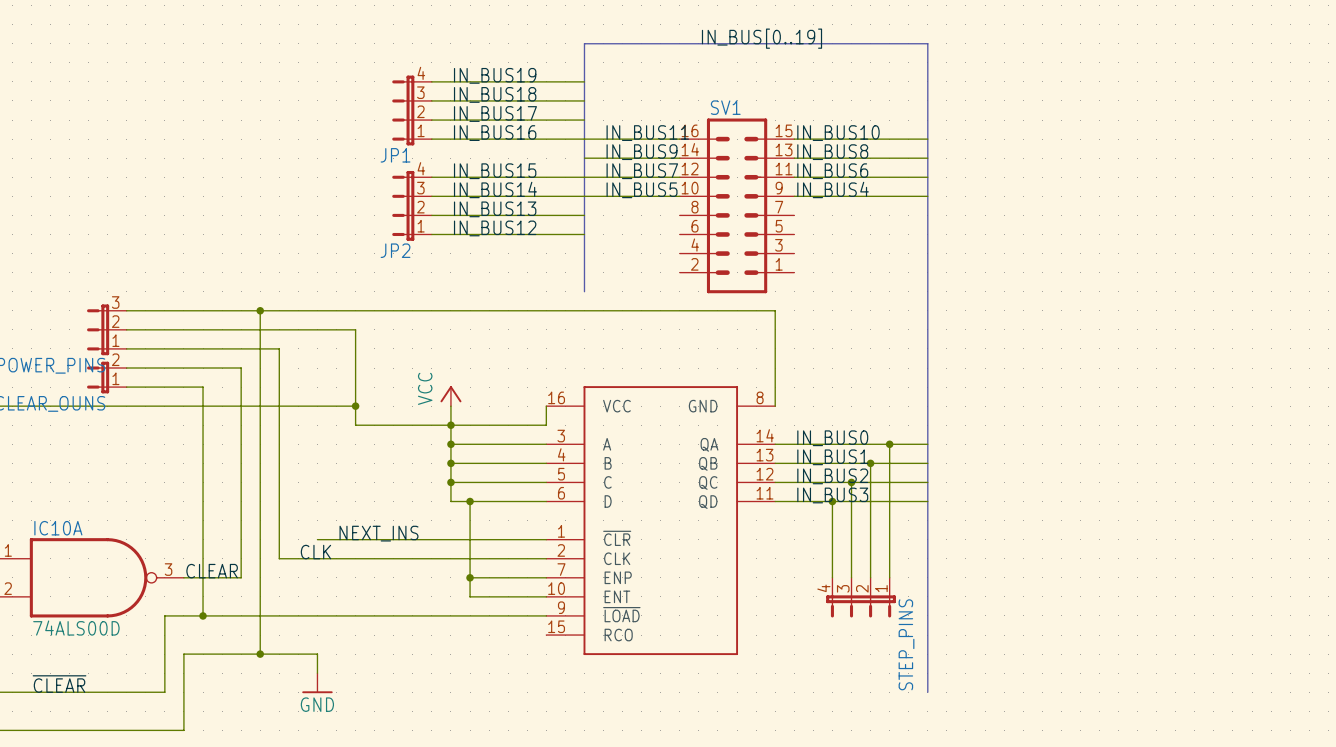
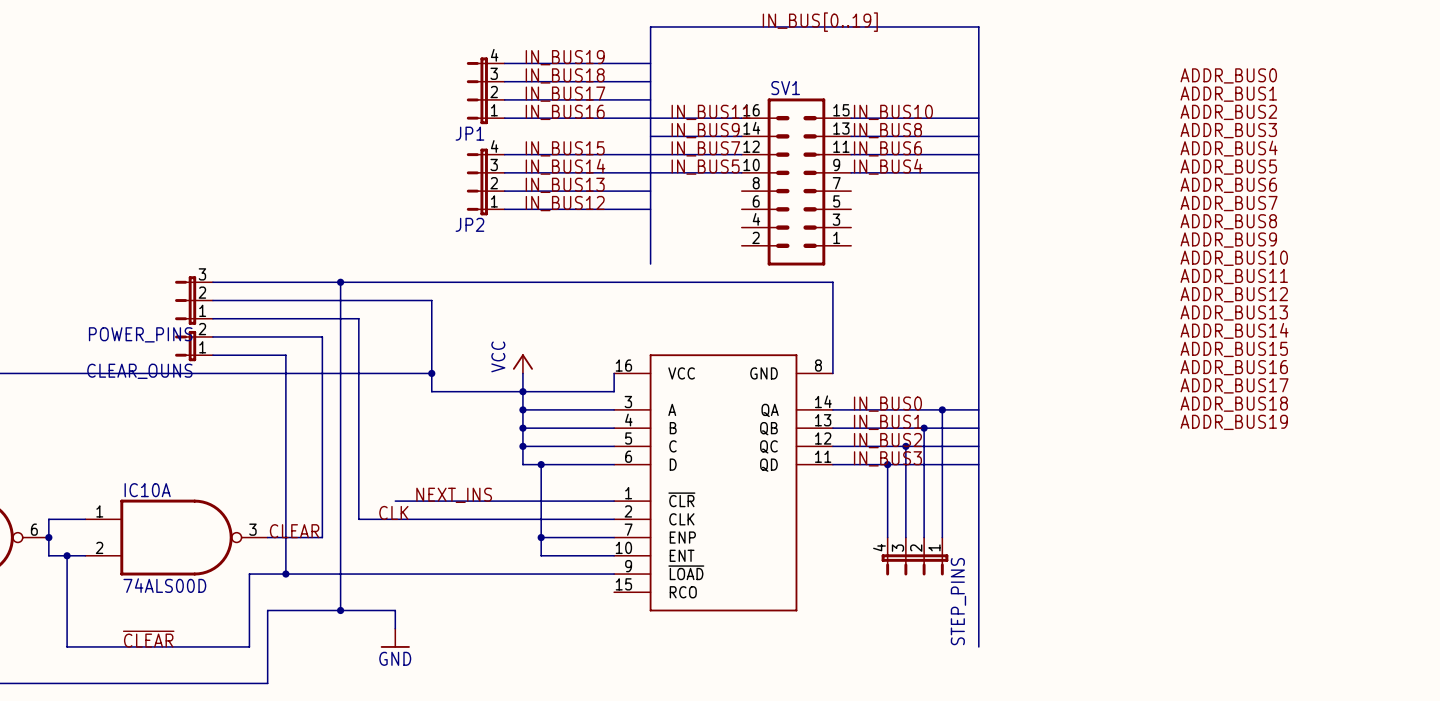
label: none -> ADDR_BUS0 (1228, 75)
label: none -> ADDR_BUS1 (1228, 94)
label: none -> ADDR_BUS2 (1228, 112)
label: none -> ADDR_BUS3 (1228, 130)
label: none -> ADDR_BUS4 (1229, 148)
label: none -> ADDR_BUS5 (1228, 167)
label: none -> ADDR_BUS6 (1228, 185)
label: none -> ADDR_BUS7 (1229, 203)
label: none -> ADDR_BUS8 (1228, 221)
label: none -> ADDR_BUS9 (1228, 240)
label: none -> ADDR_BUS10 (1234, 258)
label: none -> ADDR_BUS11 (1234, 276)
label: none -> ADDR_BUS12 (1234, 294)
label: none -> ADDR_BUS13 (1234, 312)
label: none -> ADDR_BUS14 (1234, 330)
label: none -> ADDR_BUS15 (1234, 349)
label: none -> ADDR_BUS16 (1234, 367)
label: none -> ADDR_BUS17 (1234, 385)
label: none -> ADDR_BUS18 (1234, 404)
label: none -> ADDR_BUS19 (1234, 422)

